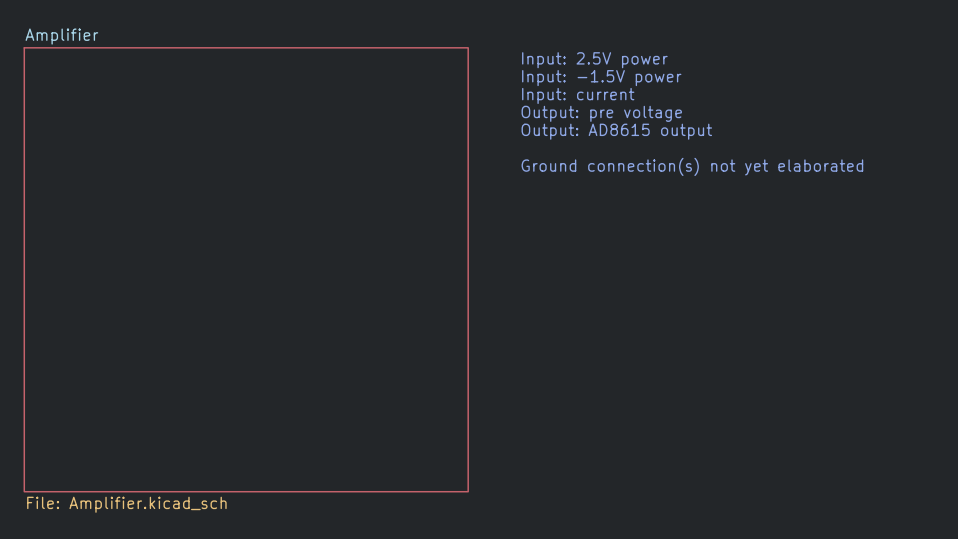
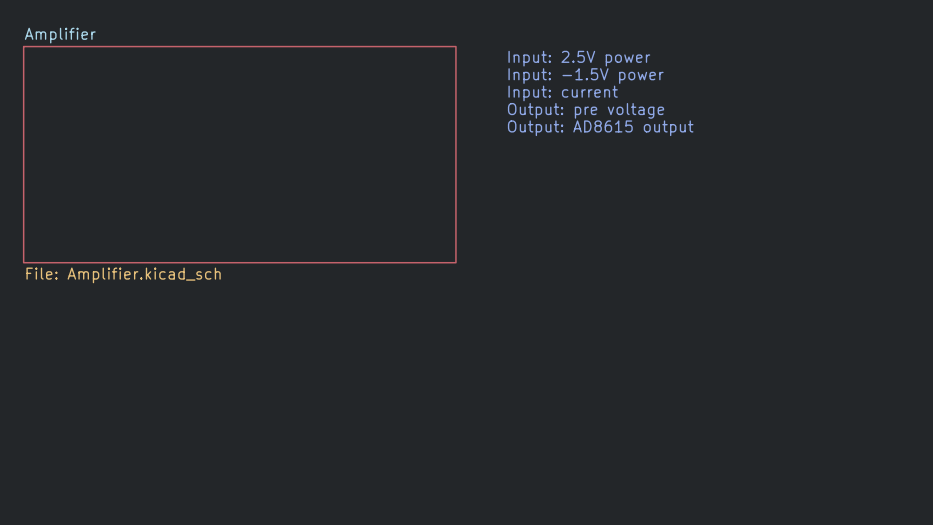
sheet Amplifier: none -> File: Amplifier.kicad_sch (239, 154)
text: Ground connection(s) not yet elaborated (692, 166) -> none
sheet Amplifier: File: Amplifier.kicad_sch (246, 269) -> none

